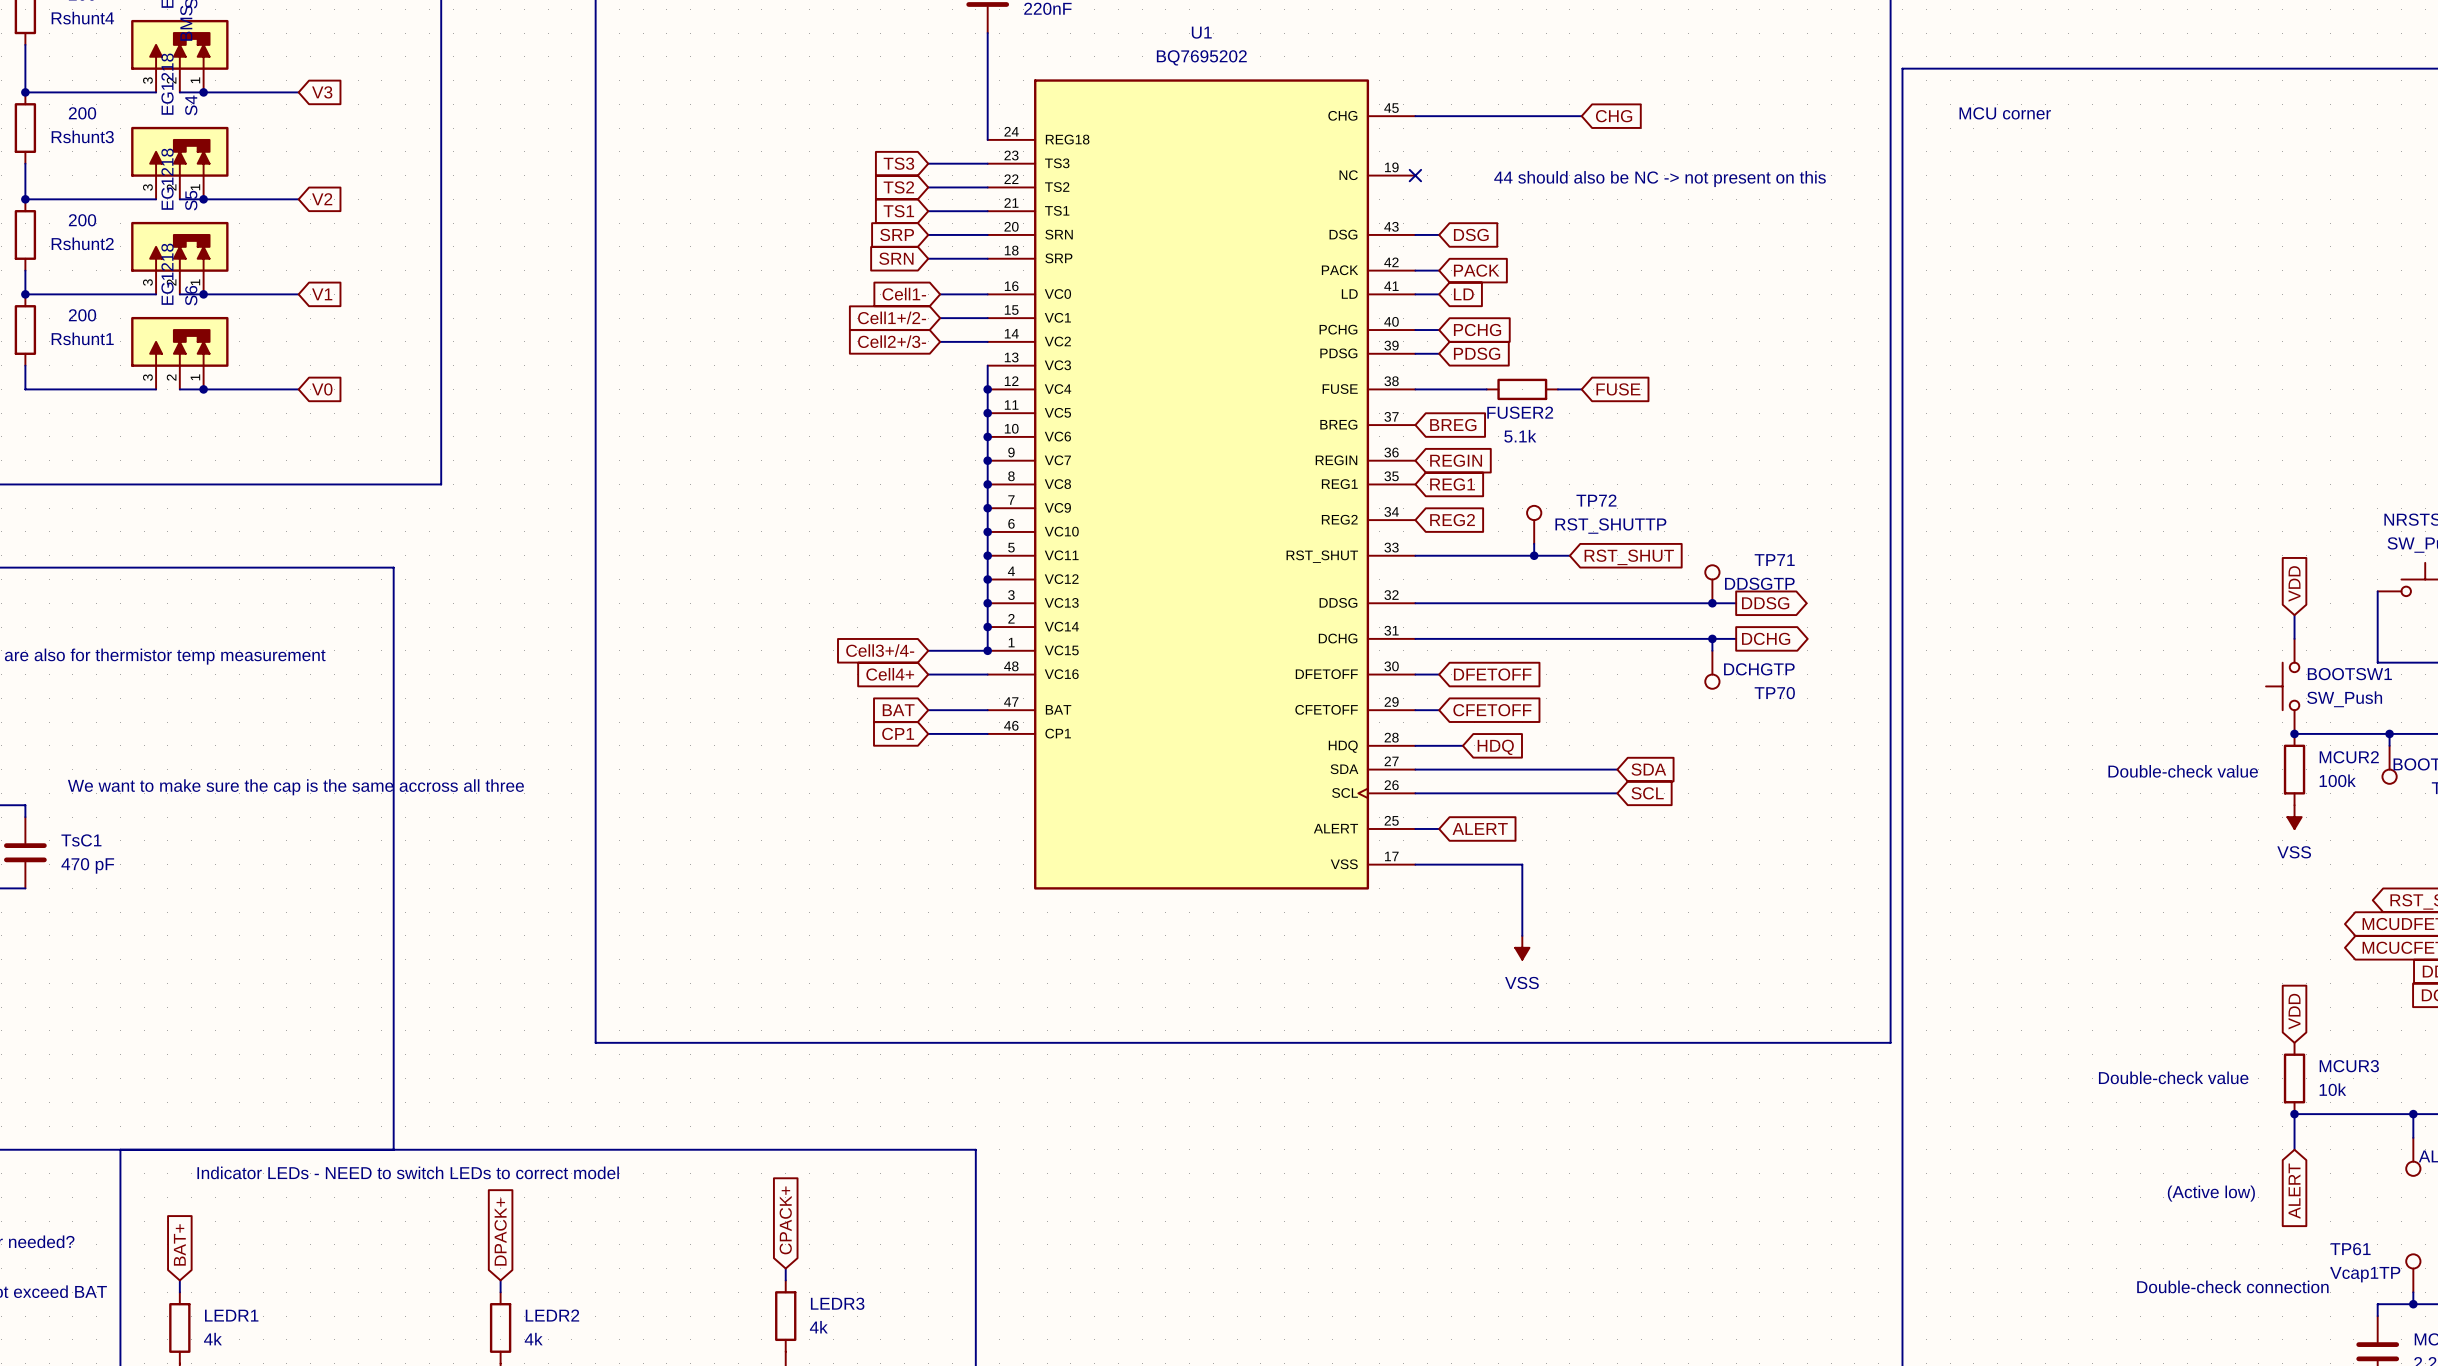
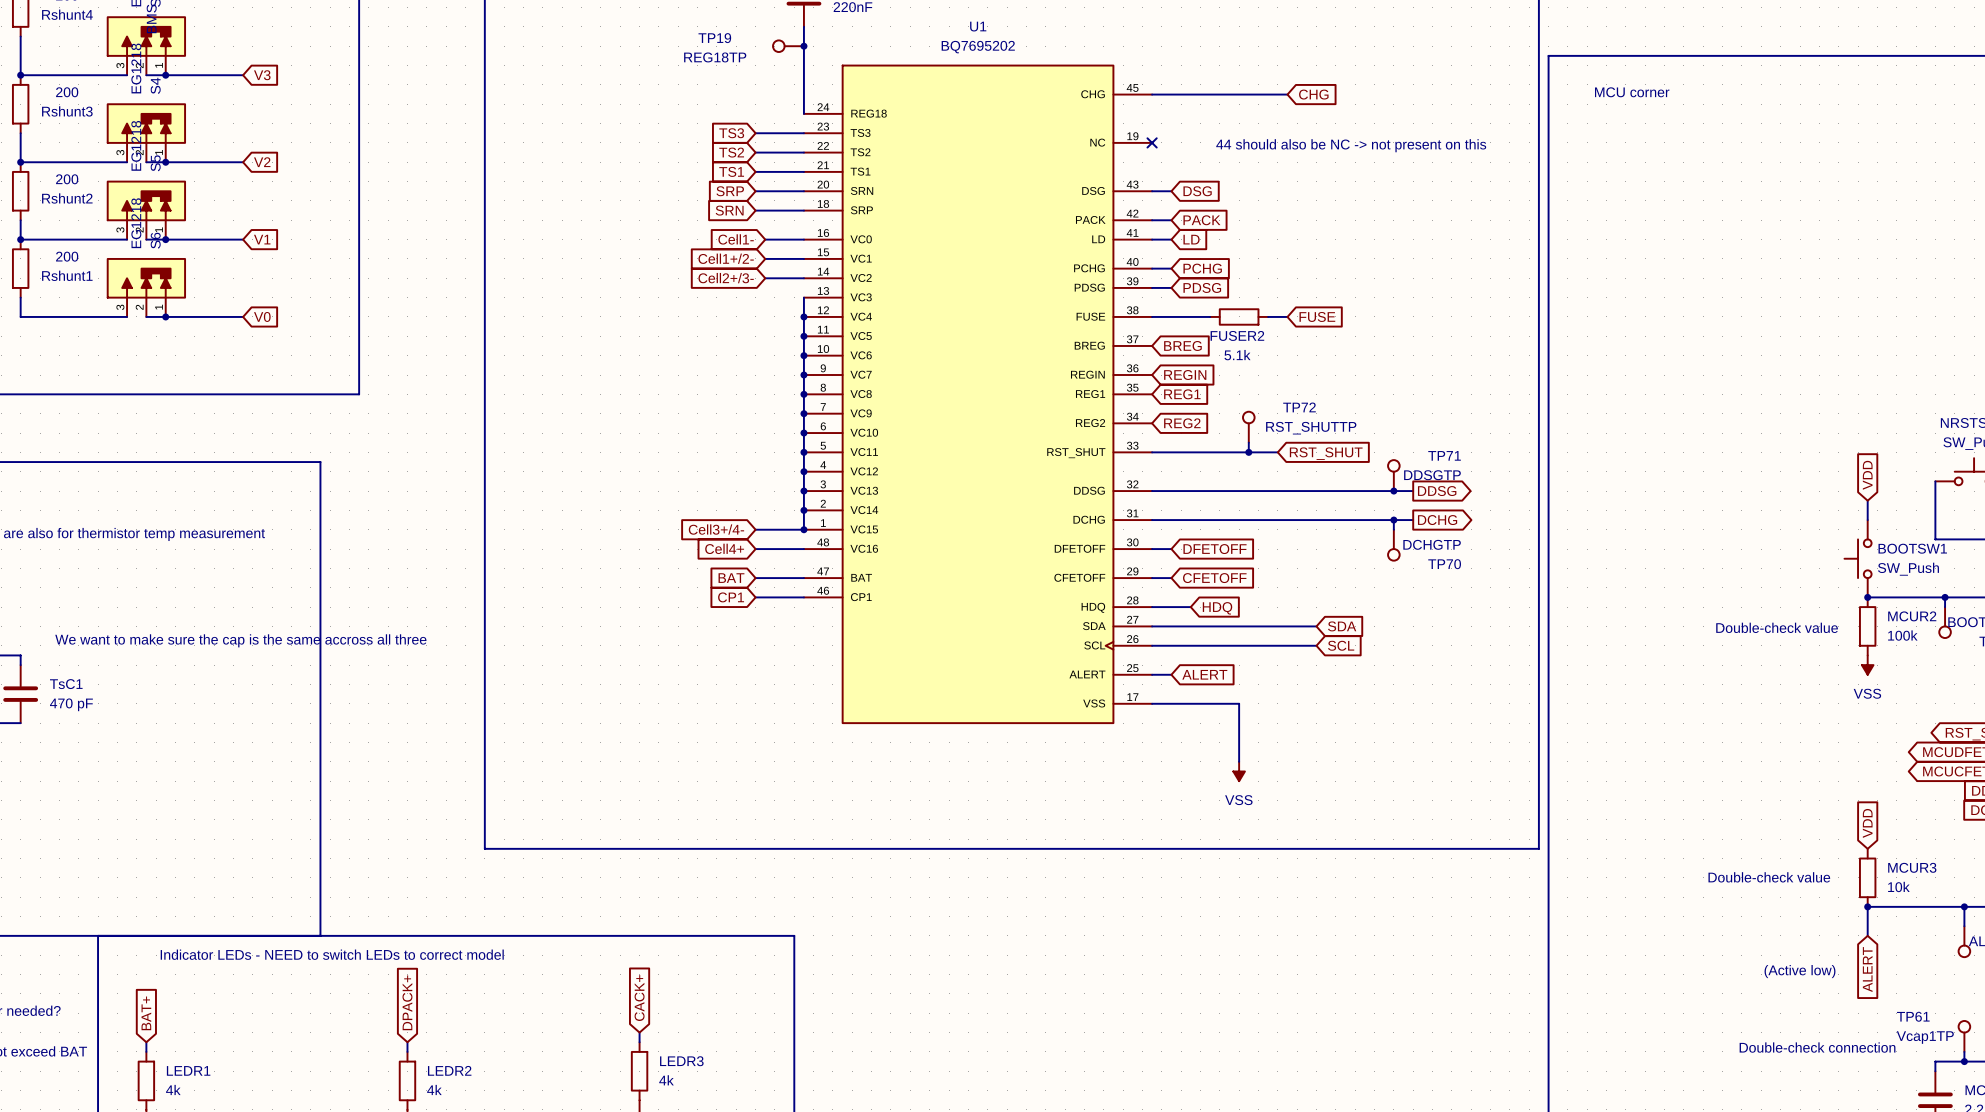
TP19: none -> REG18TP (788, 46)
junction: none -> (803, 46)
global label: CPACK+ (785, 1220) -> CACK+ (639, 998)

